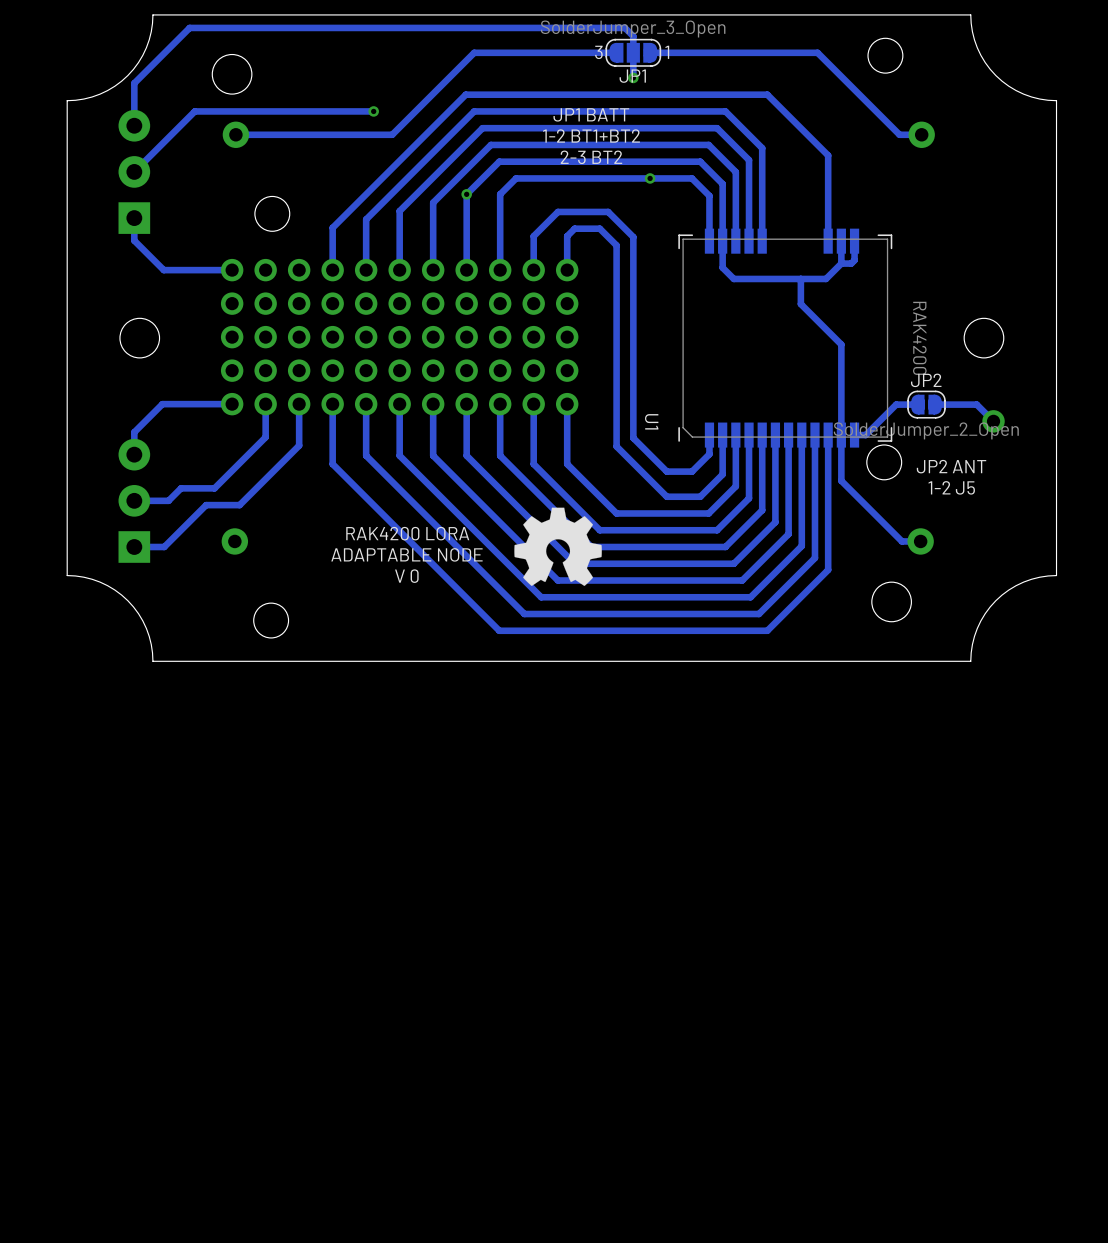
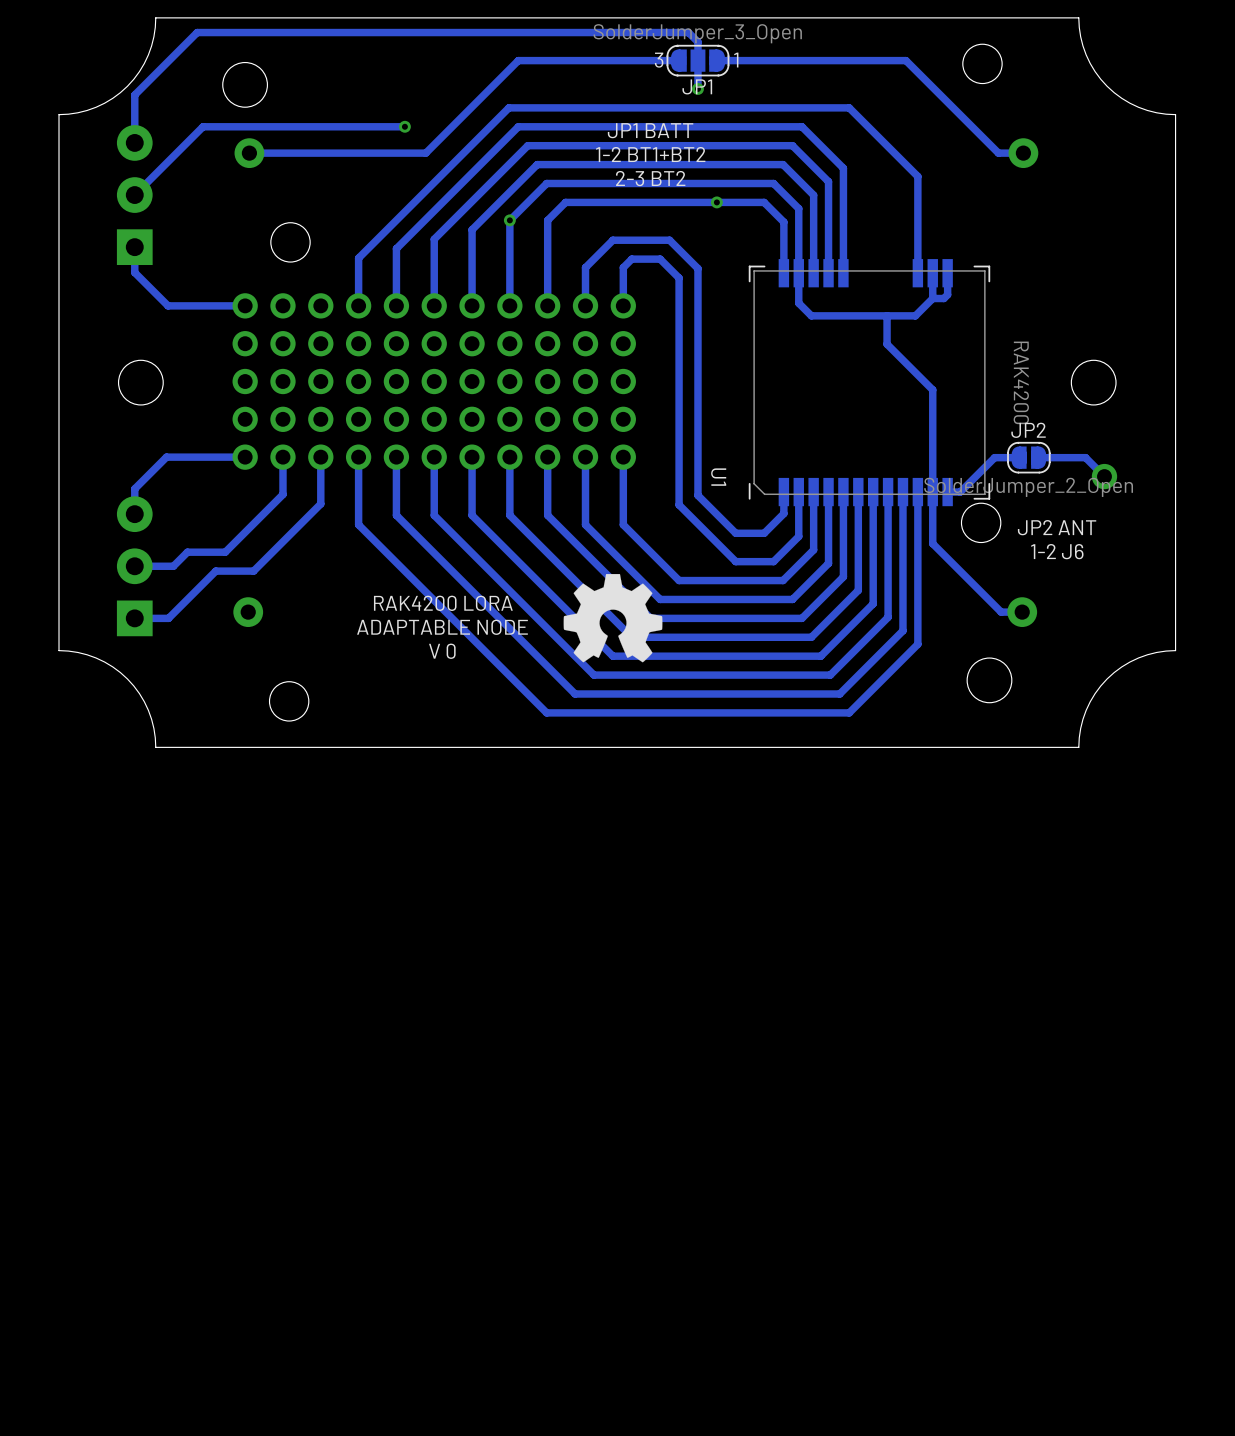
text: 1-2 J5 (951, 487) -> 1-2 J6 (1057, 551)

